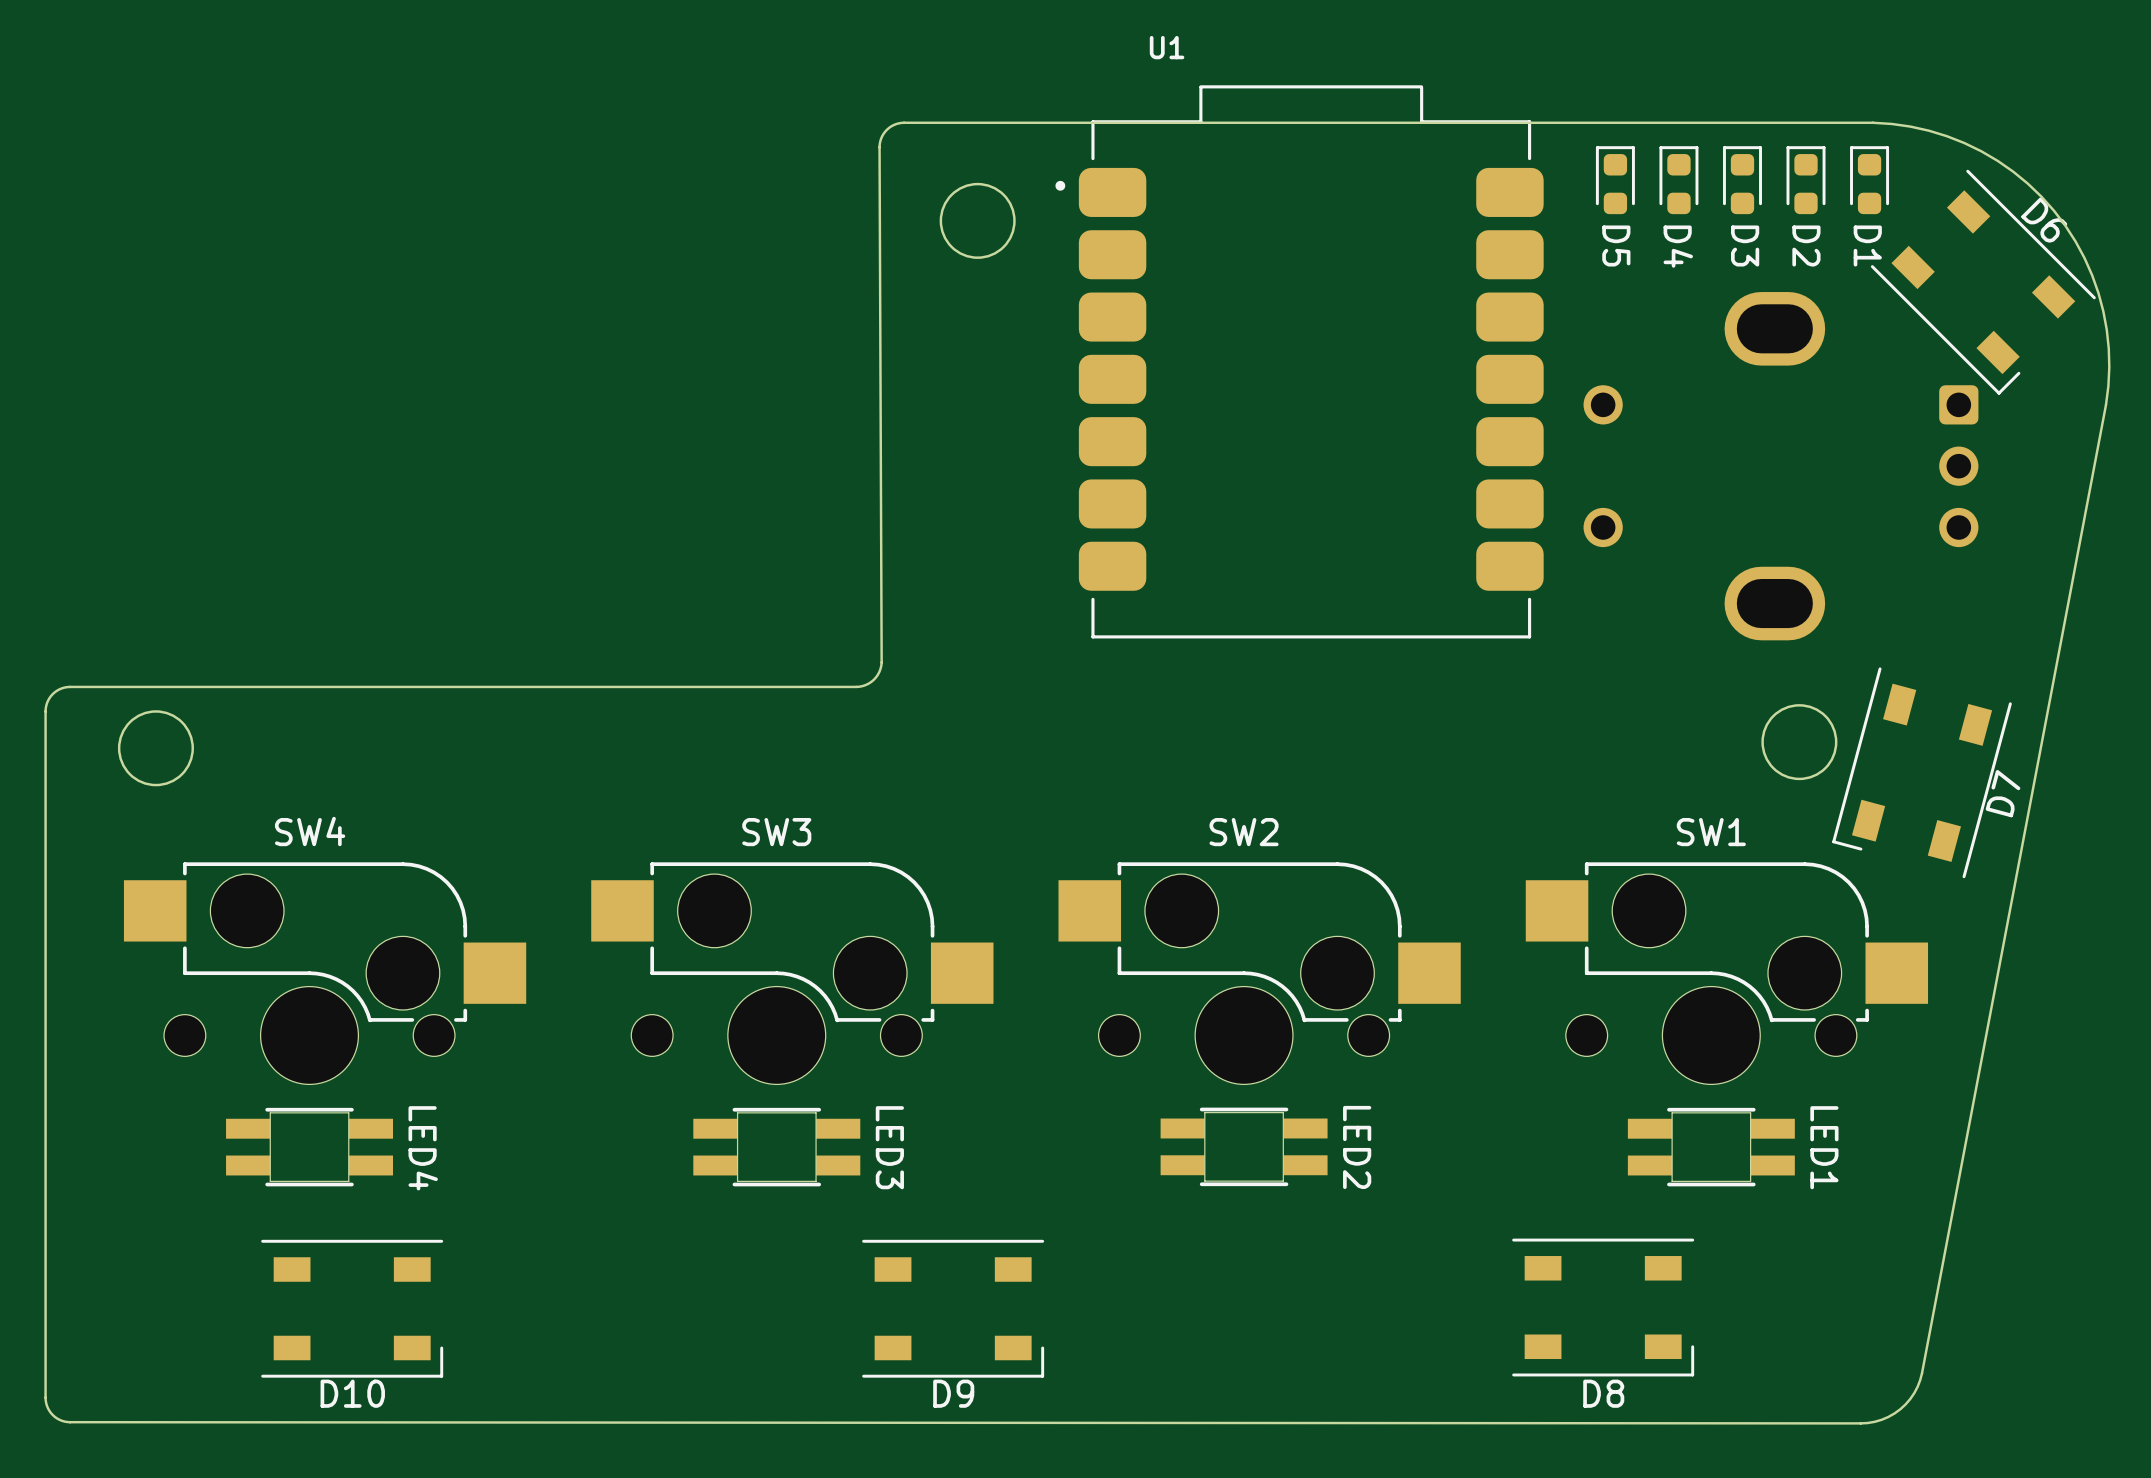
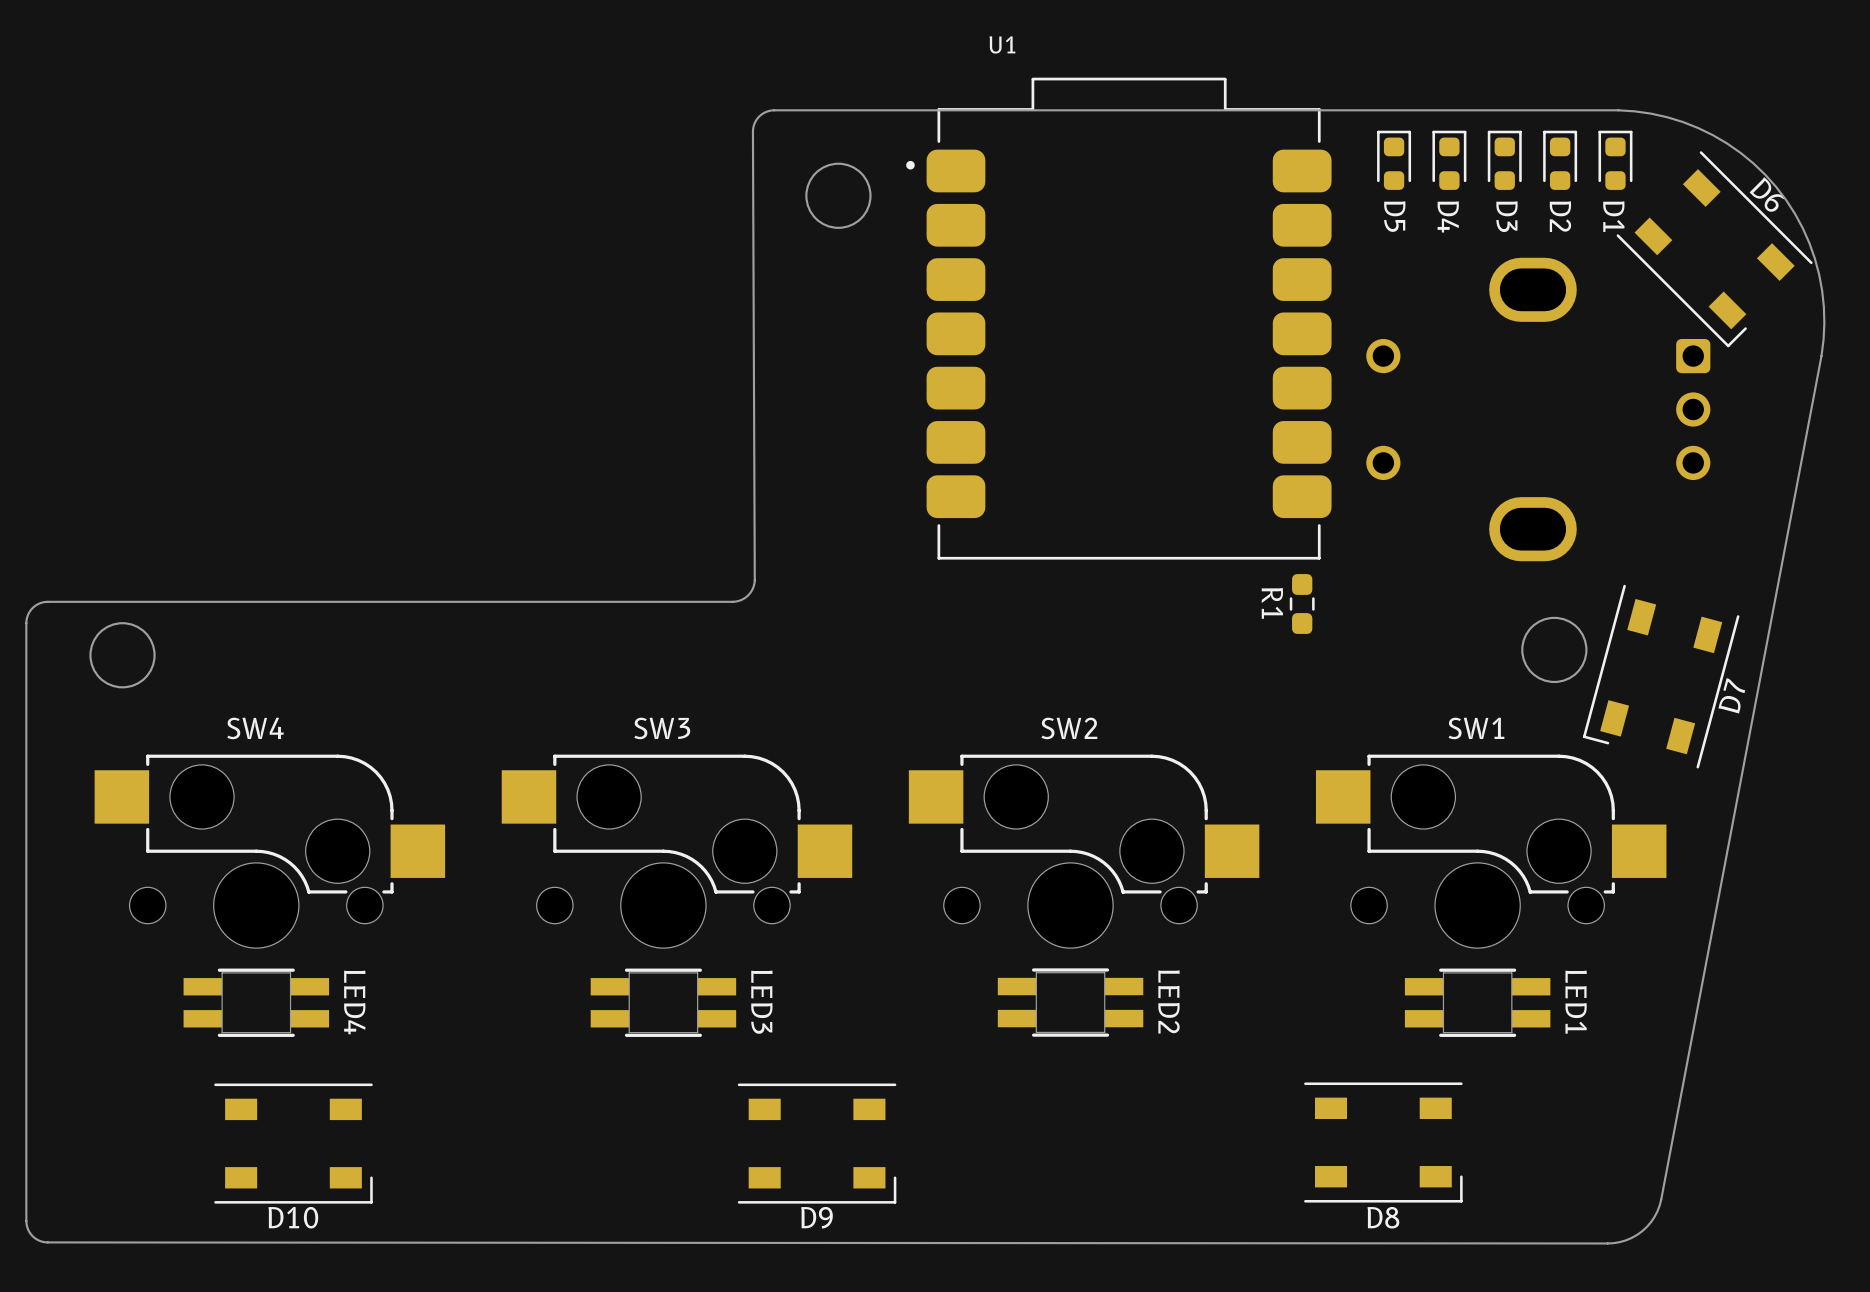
R1: none -> (1302, 603)

